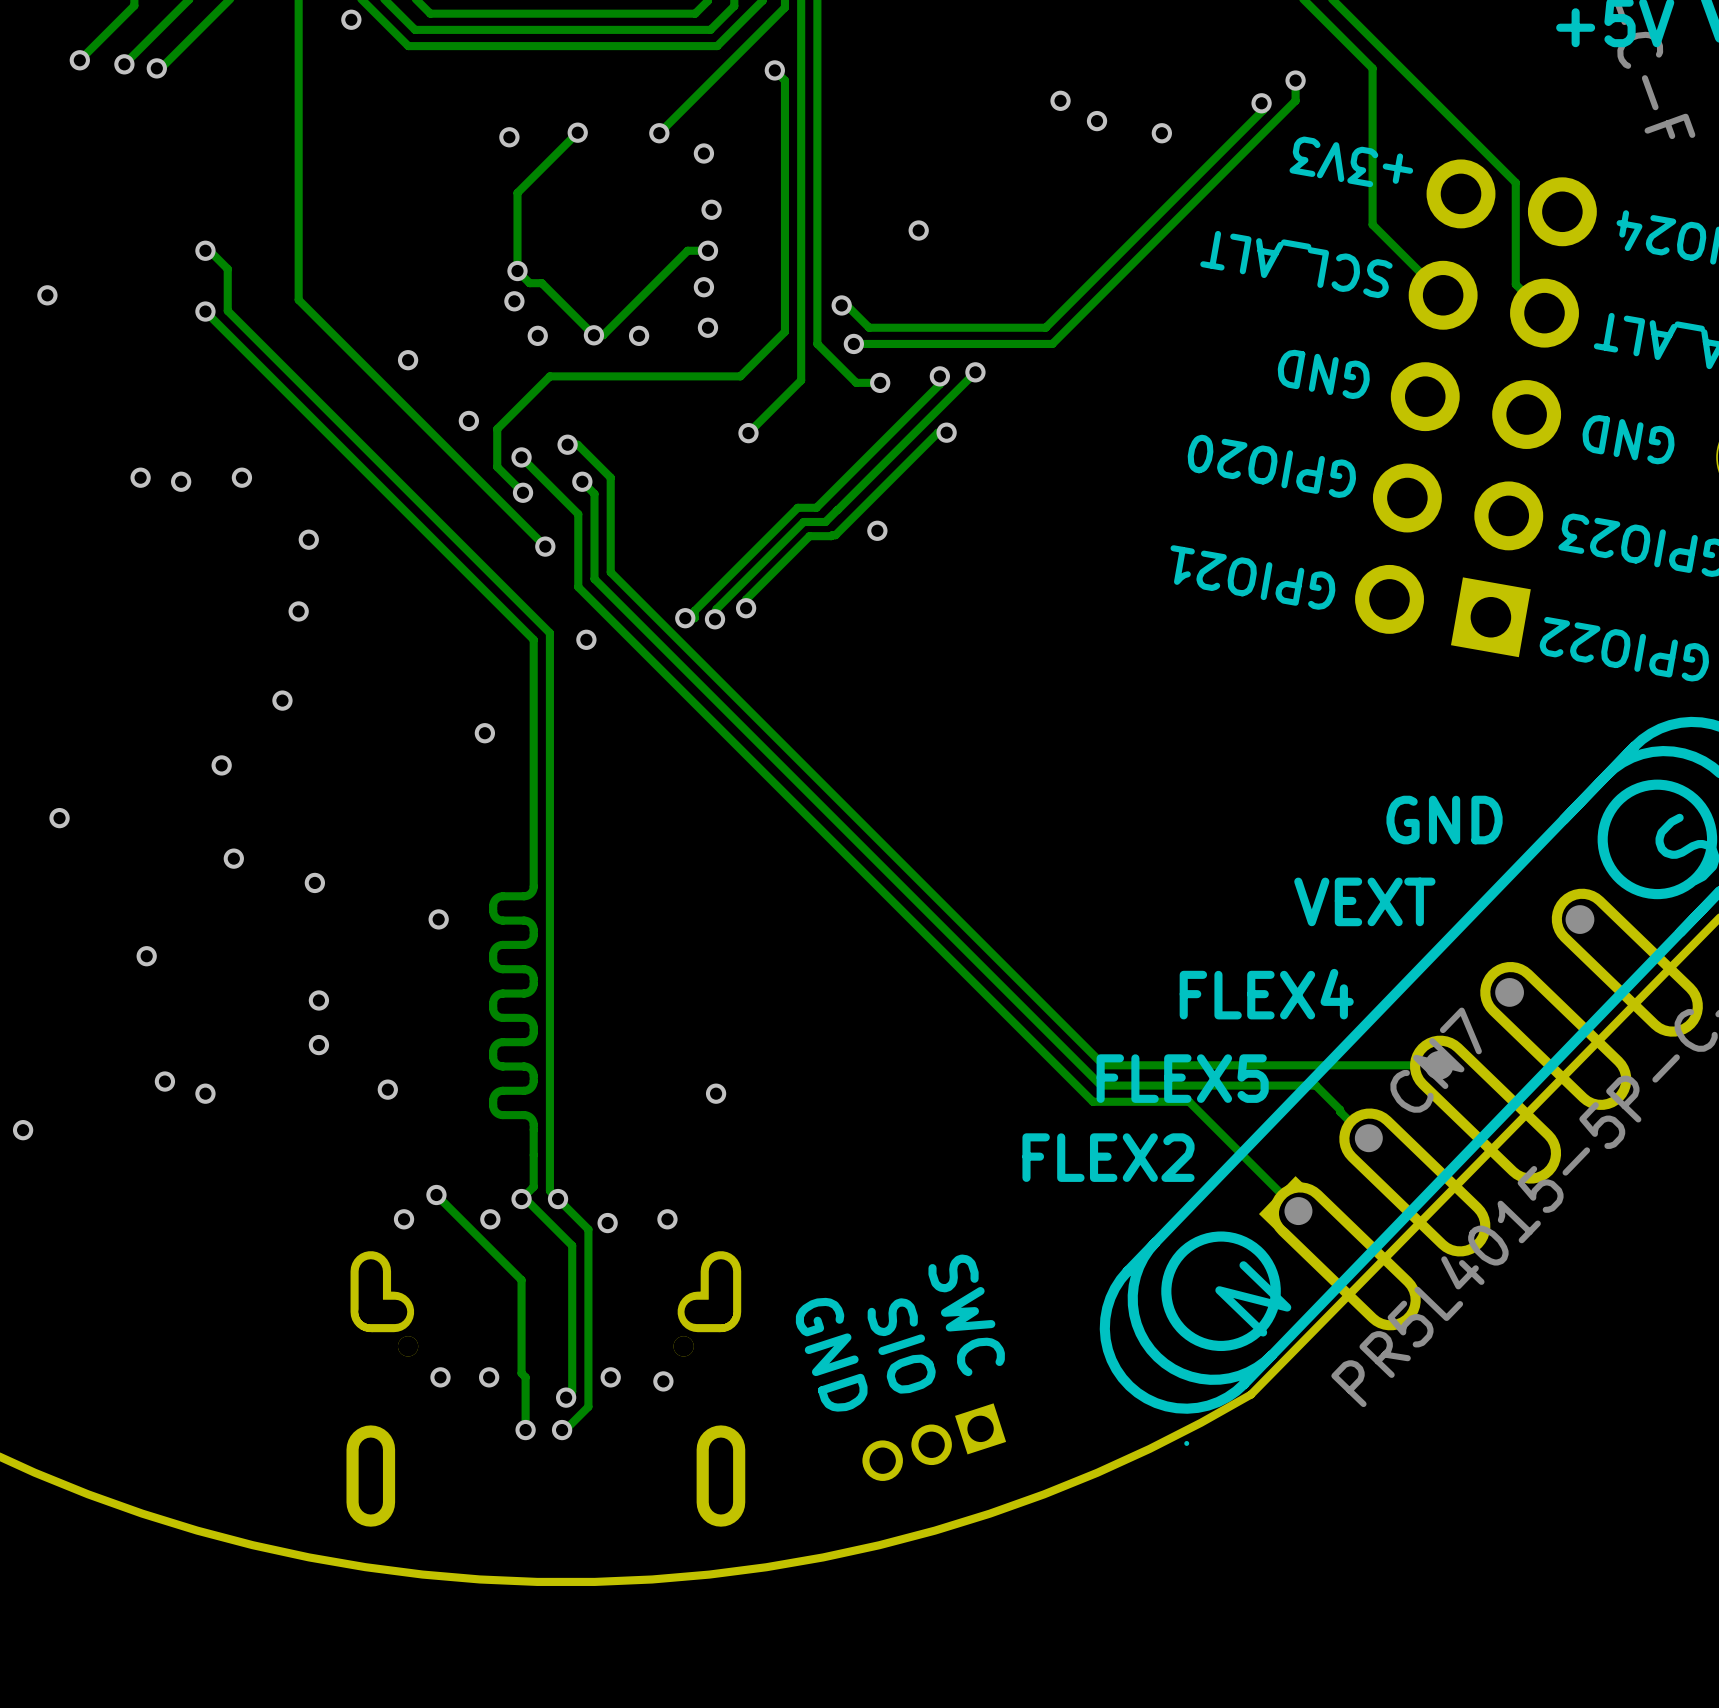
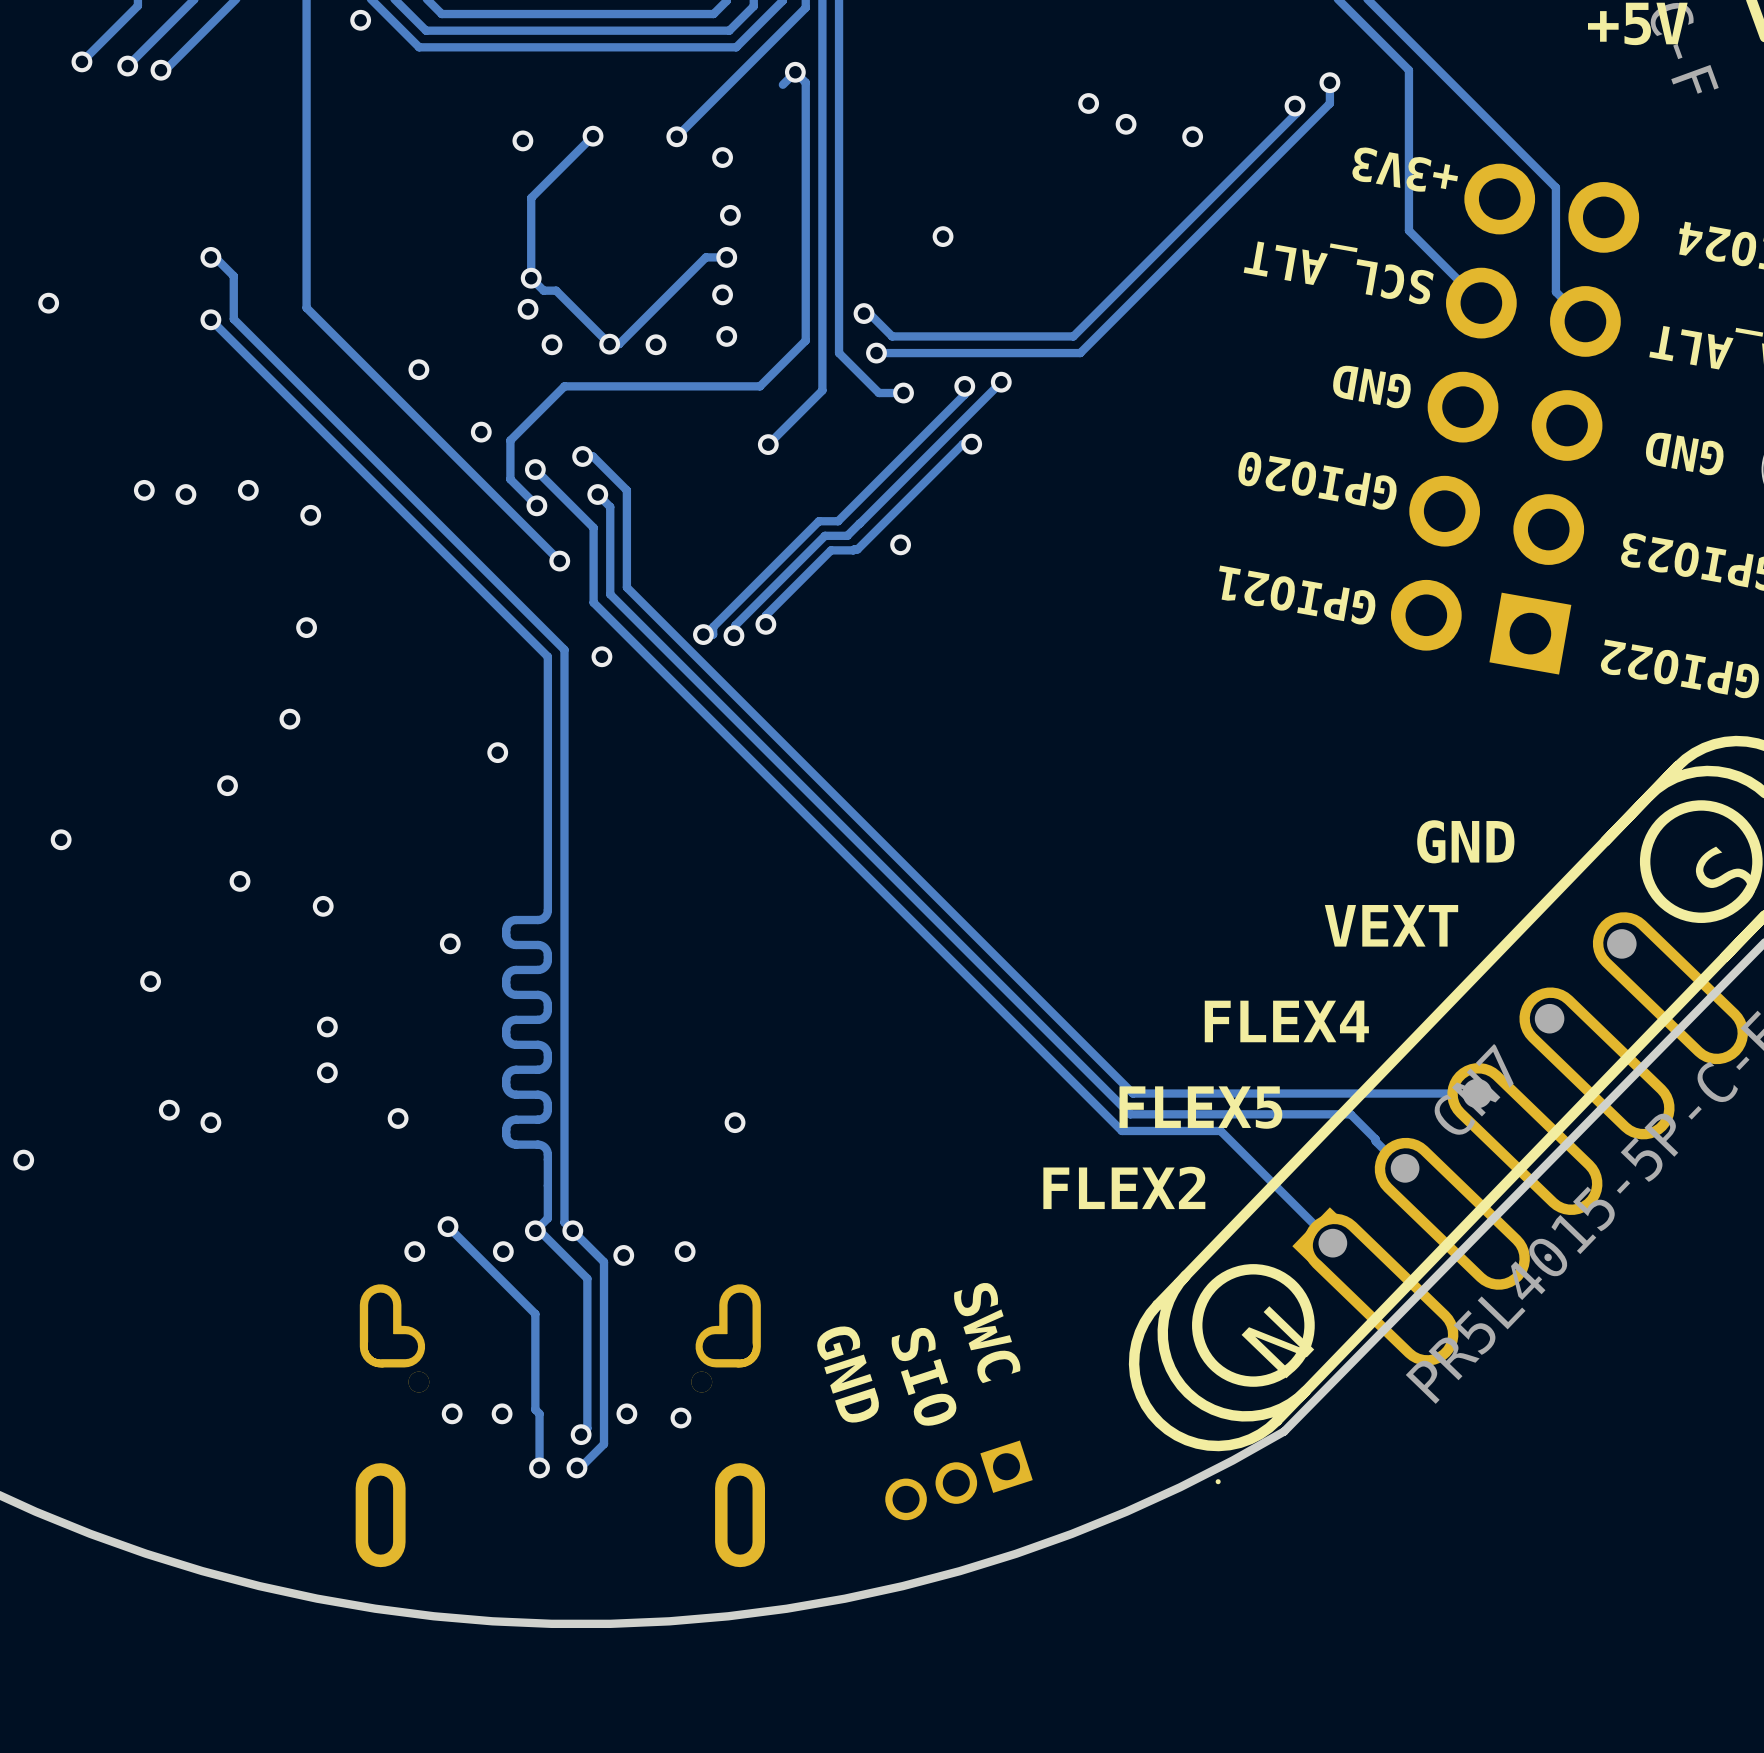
track: none -> (795, 72) (782, 84)
via position: (308, 539) -> (310, 515)

